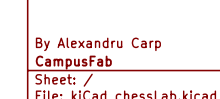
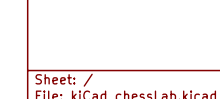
title block: By Alexandru Carp (98, 44) -> none
title block: CampusFab (73, 62) -> none

